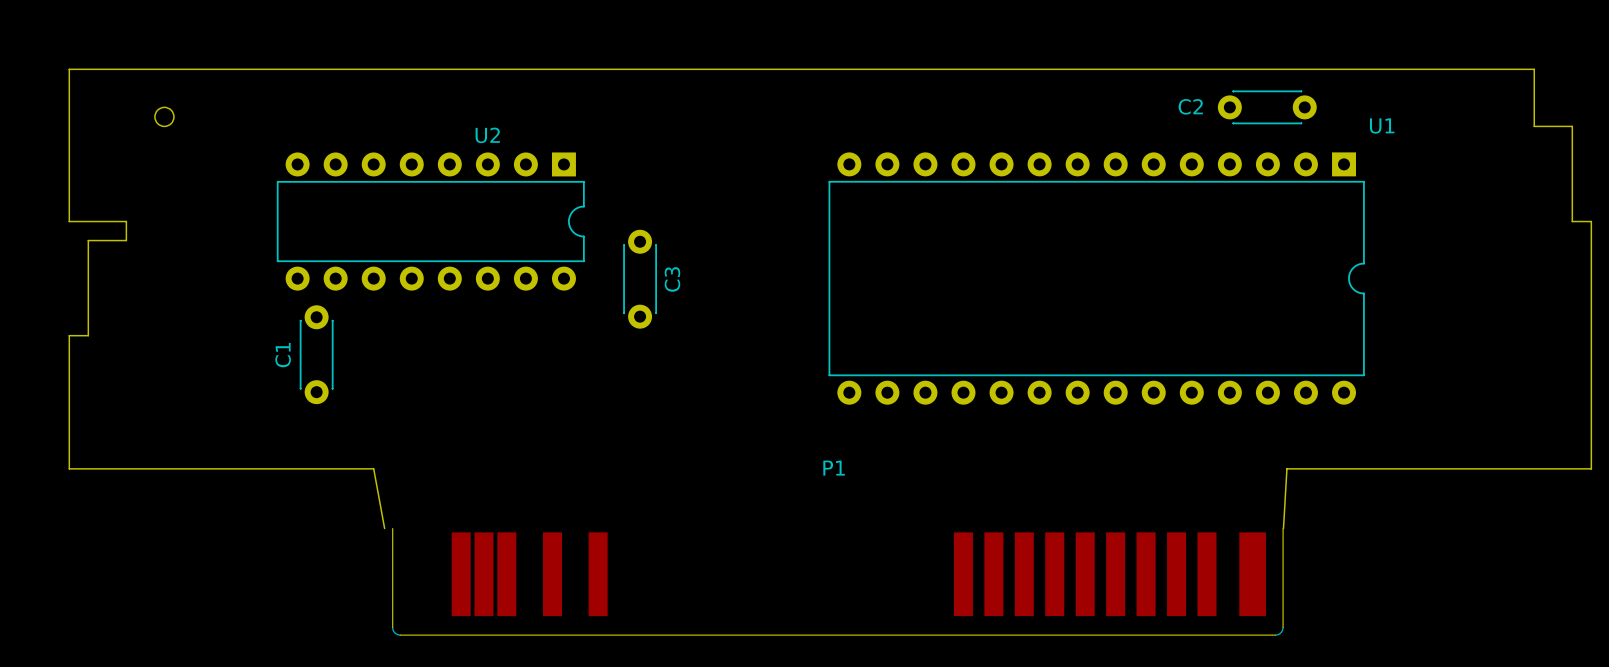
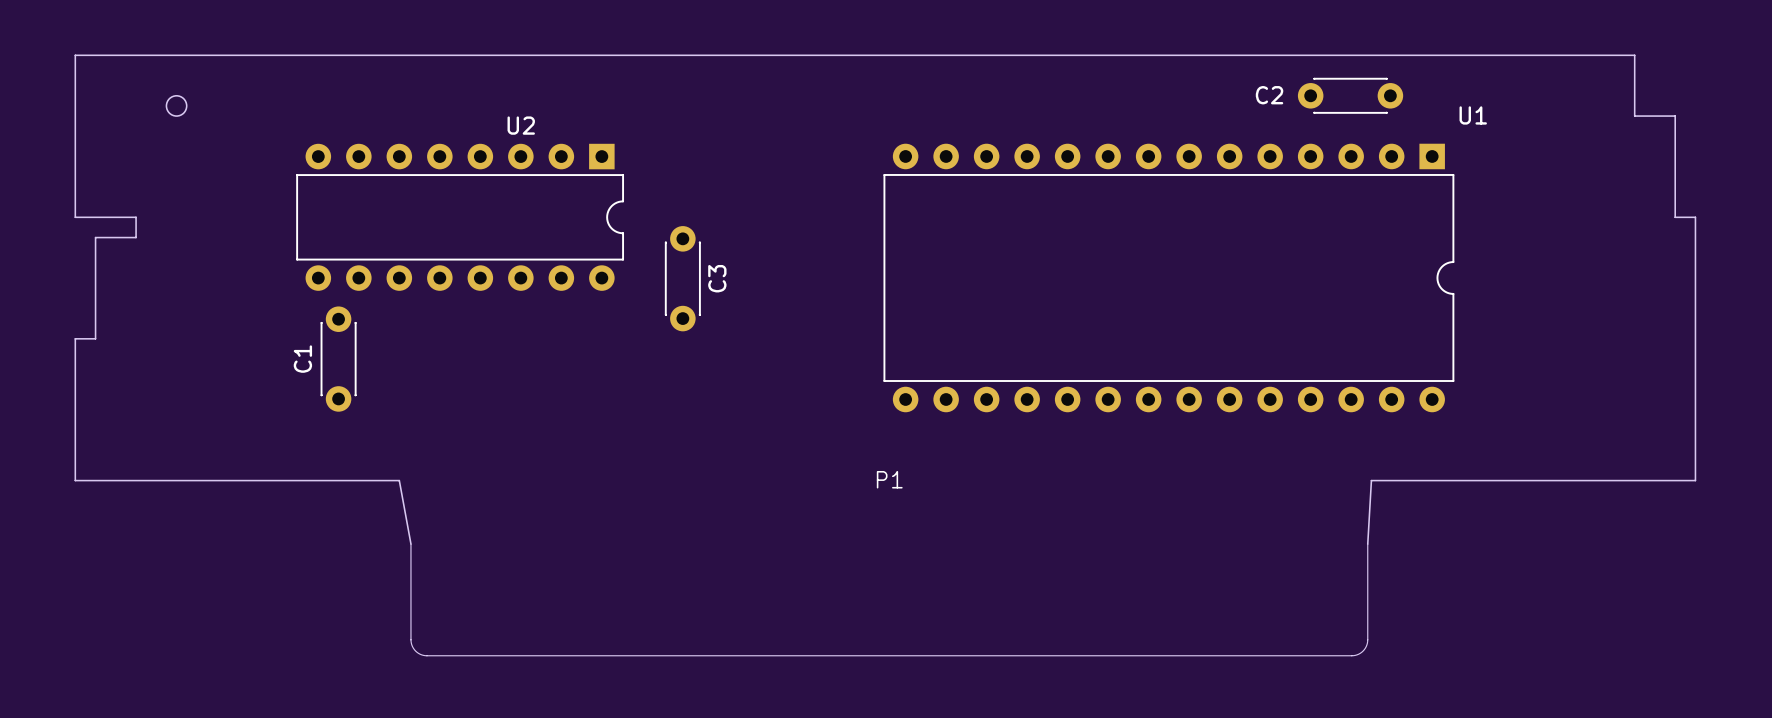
P1 footprint: [392, 528, 1284, 636] -> [410, 543, 1369, 657]

